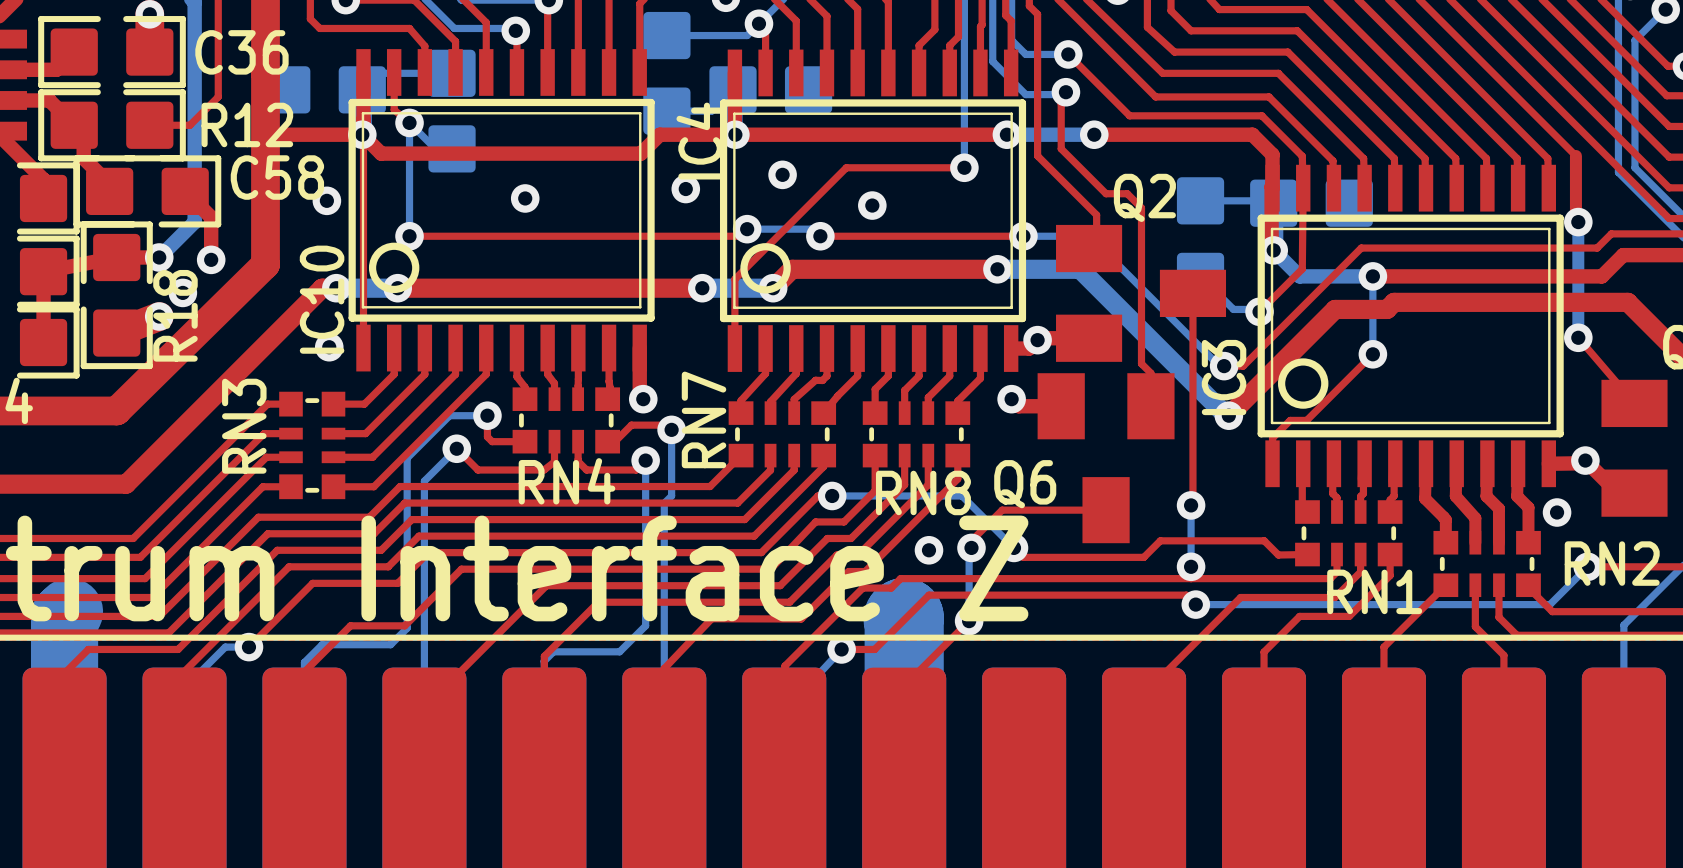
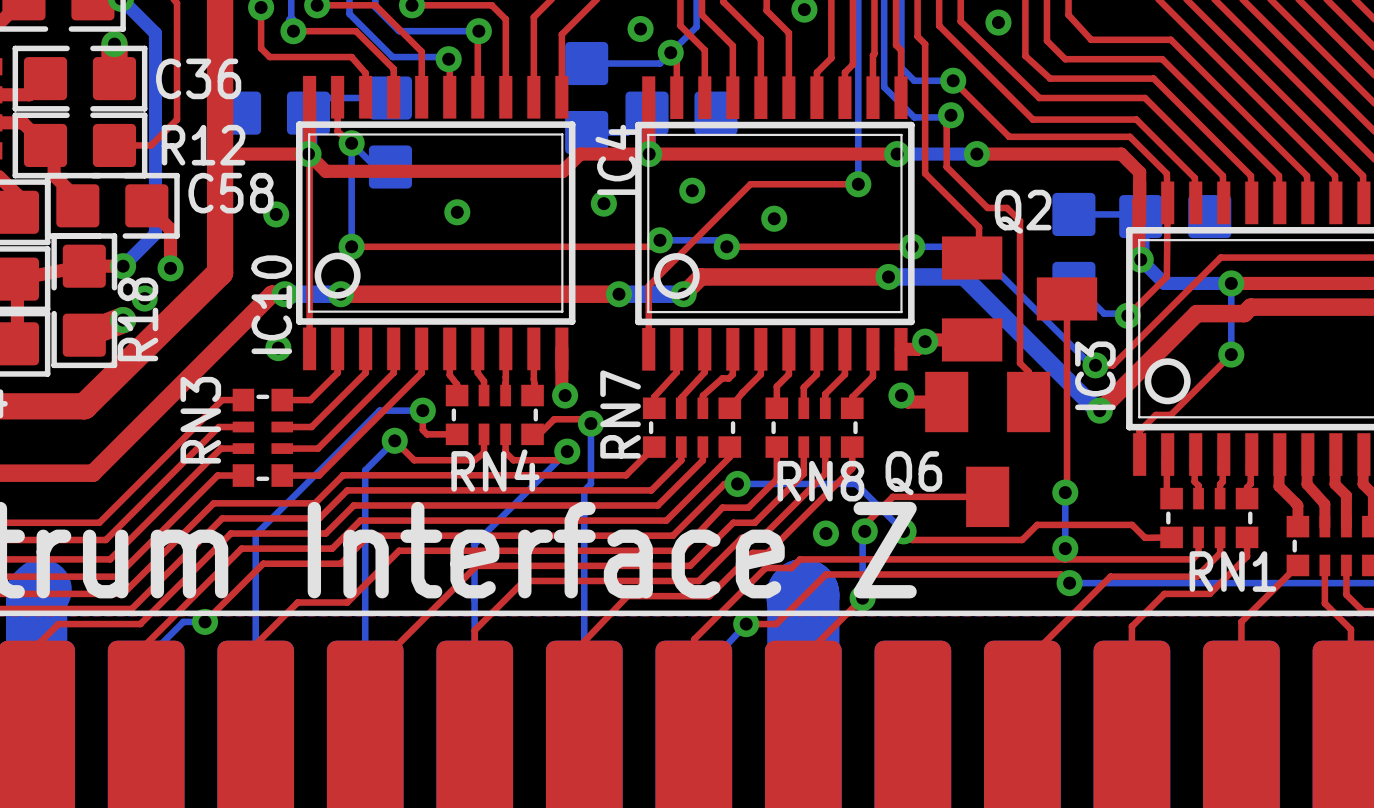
bottom track: (449, 415) (407, 458) (407, 628) (390, 644) (322, 644) (304, 662) -> (388, 410) (379, 410) (255, 534) (255, 635)
bottom track: (645, 460) (645, 625) (619, 651) (553, 651) (544, 661) (546, 703) (534, 696) -> (567, 451) (474, 544) (474, 643)

